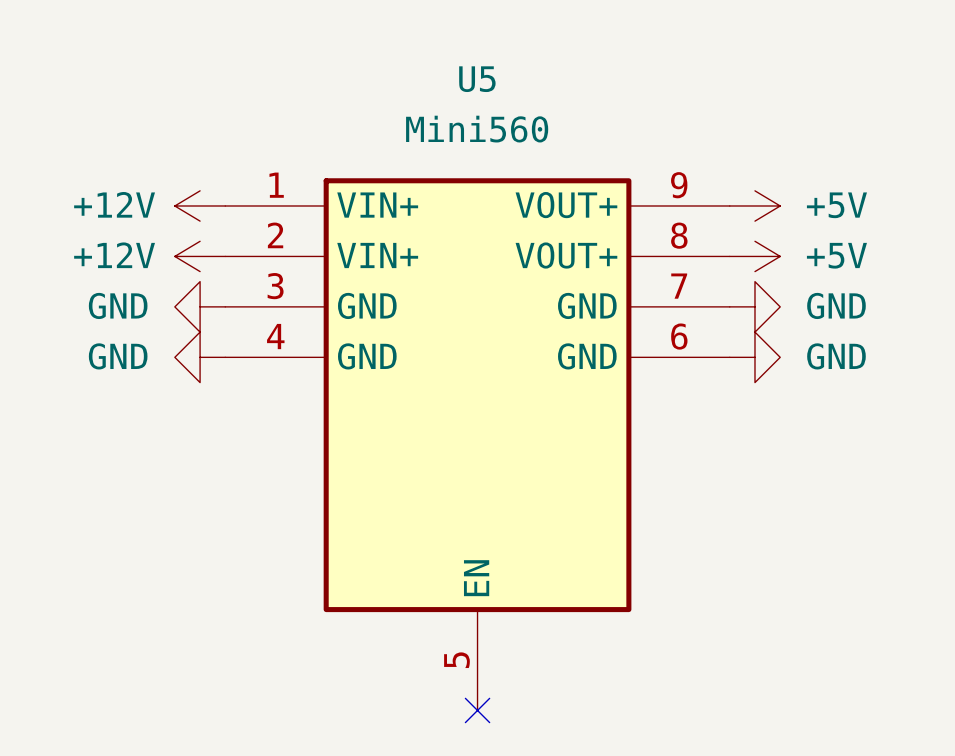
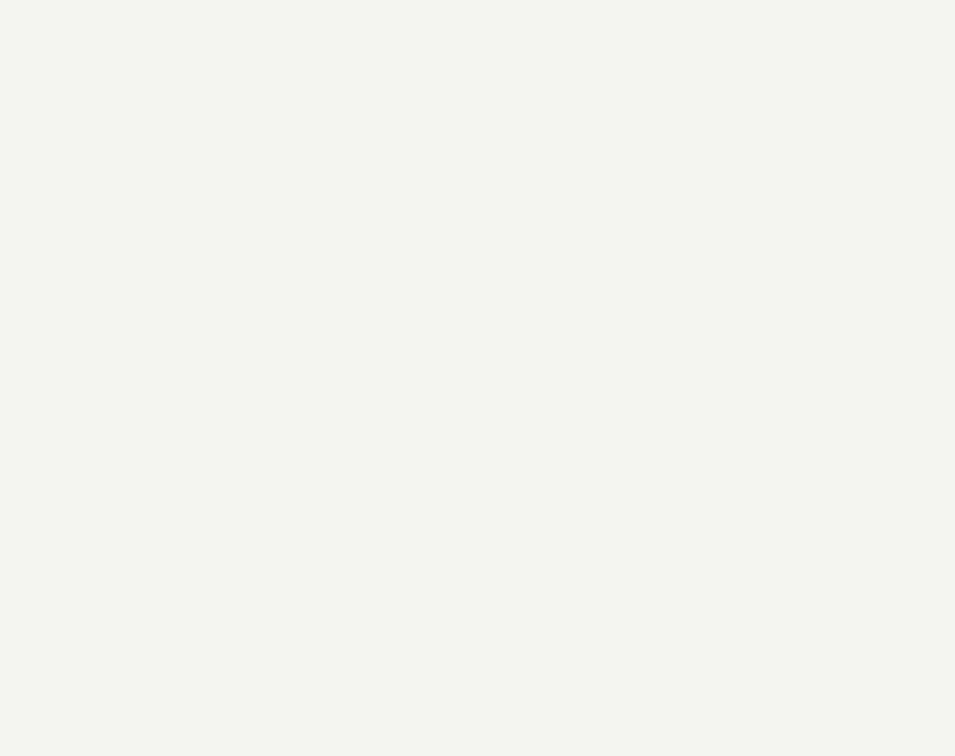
power symbol: +12V (200, 205) -> none
power symbol: +5V (754, 205) -> none
power symbol: +12V (200, 256) -> none
power symbol: +5V (754, 256) -> none
power symbol: GND (200, 306) -> none
power symbol: GND (754, 306) -> none
power symbol: GND (200, 357) -> none
power symbol: GND (754, 357) -> none
U5: Mini560 (477, 444) -> none
no-connect mark: (477, 710) -> none

